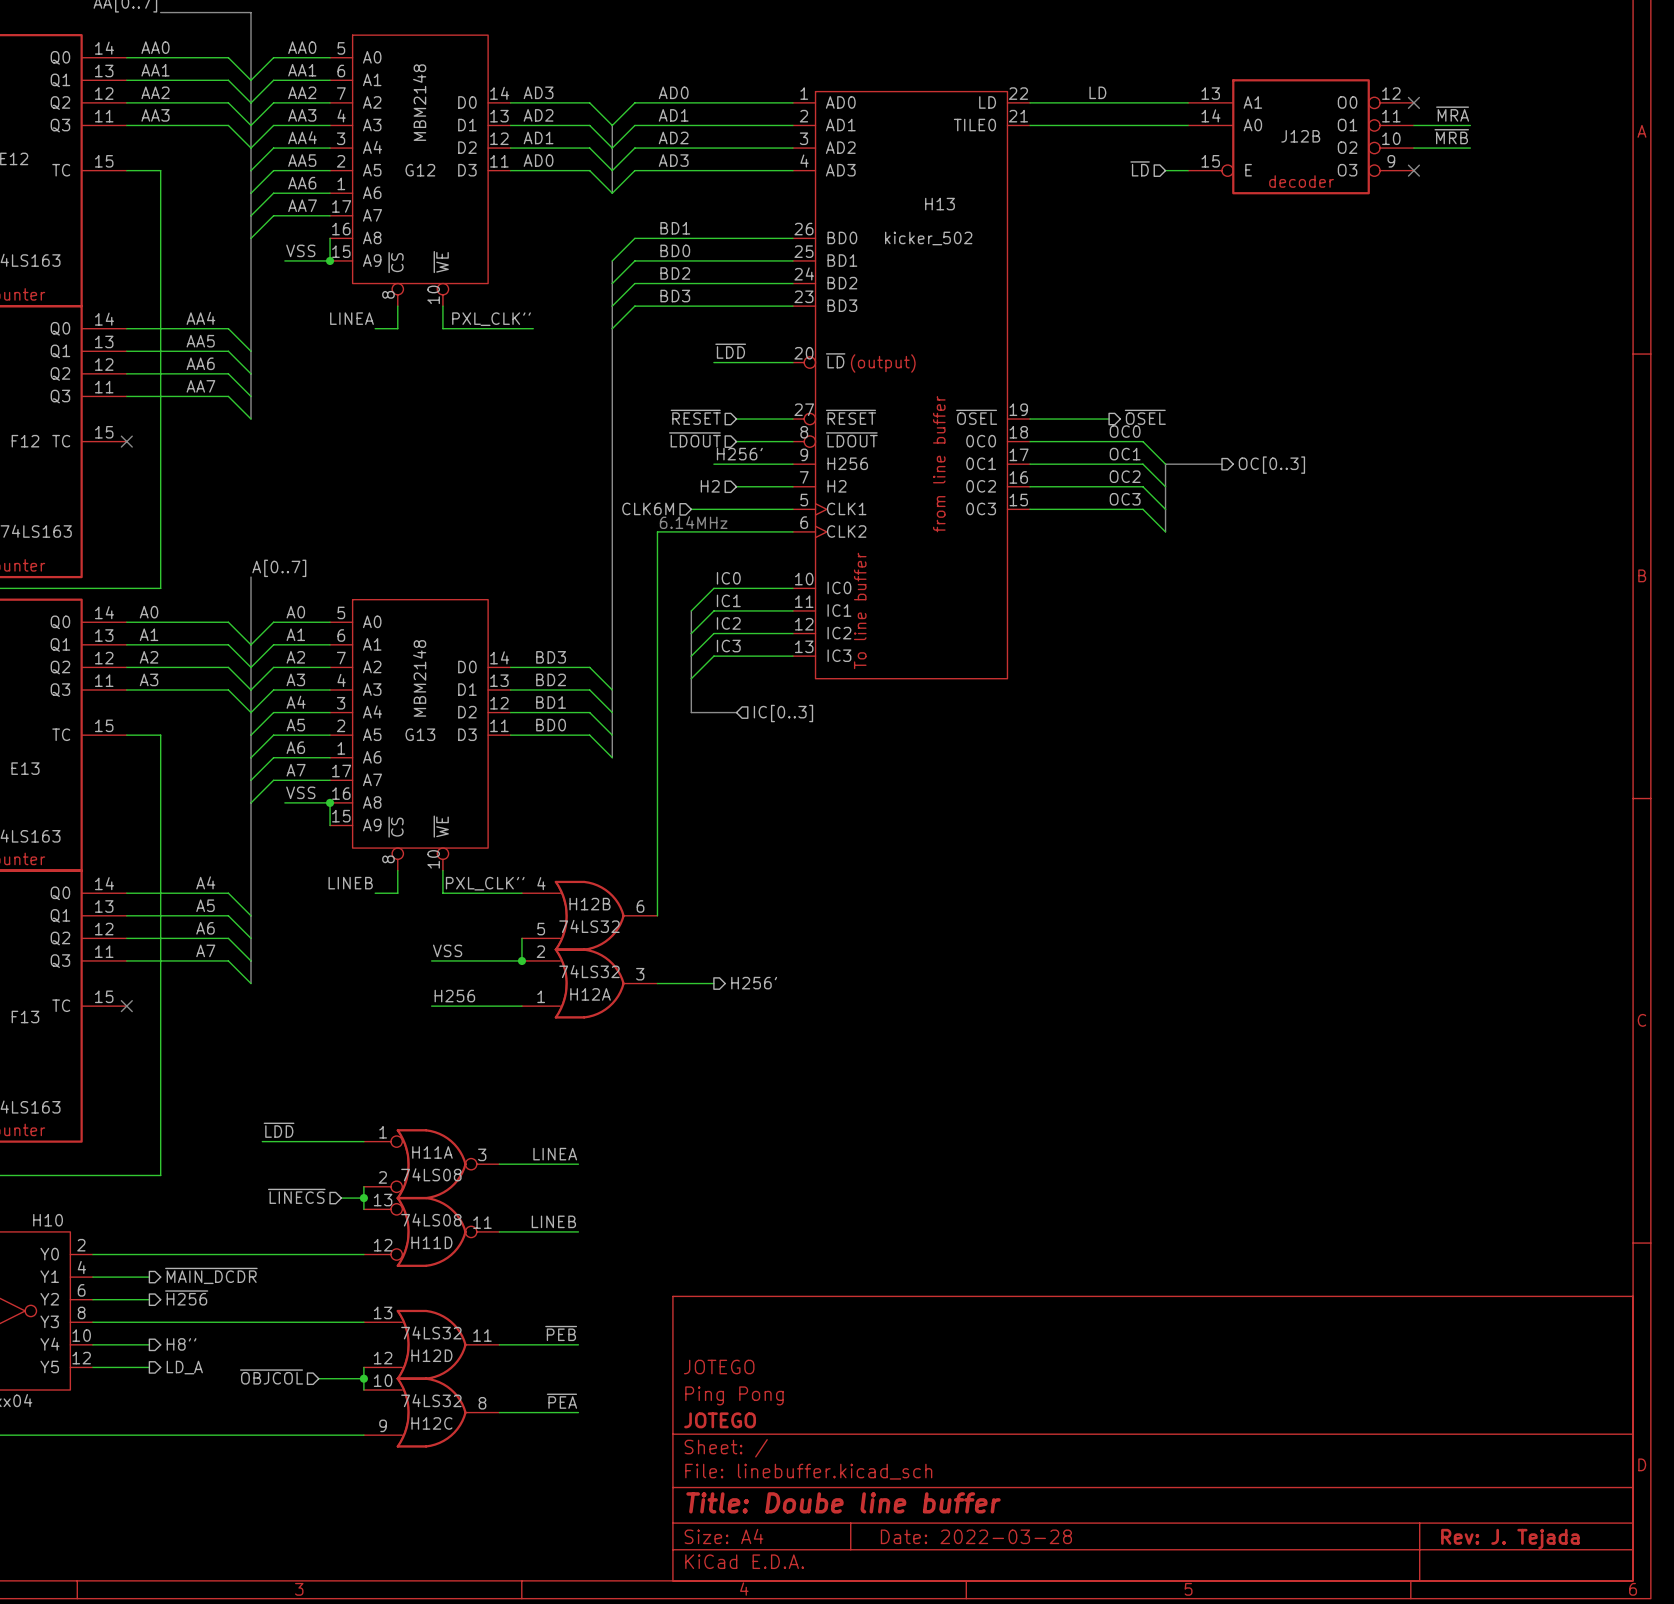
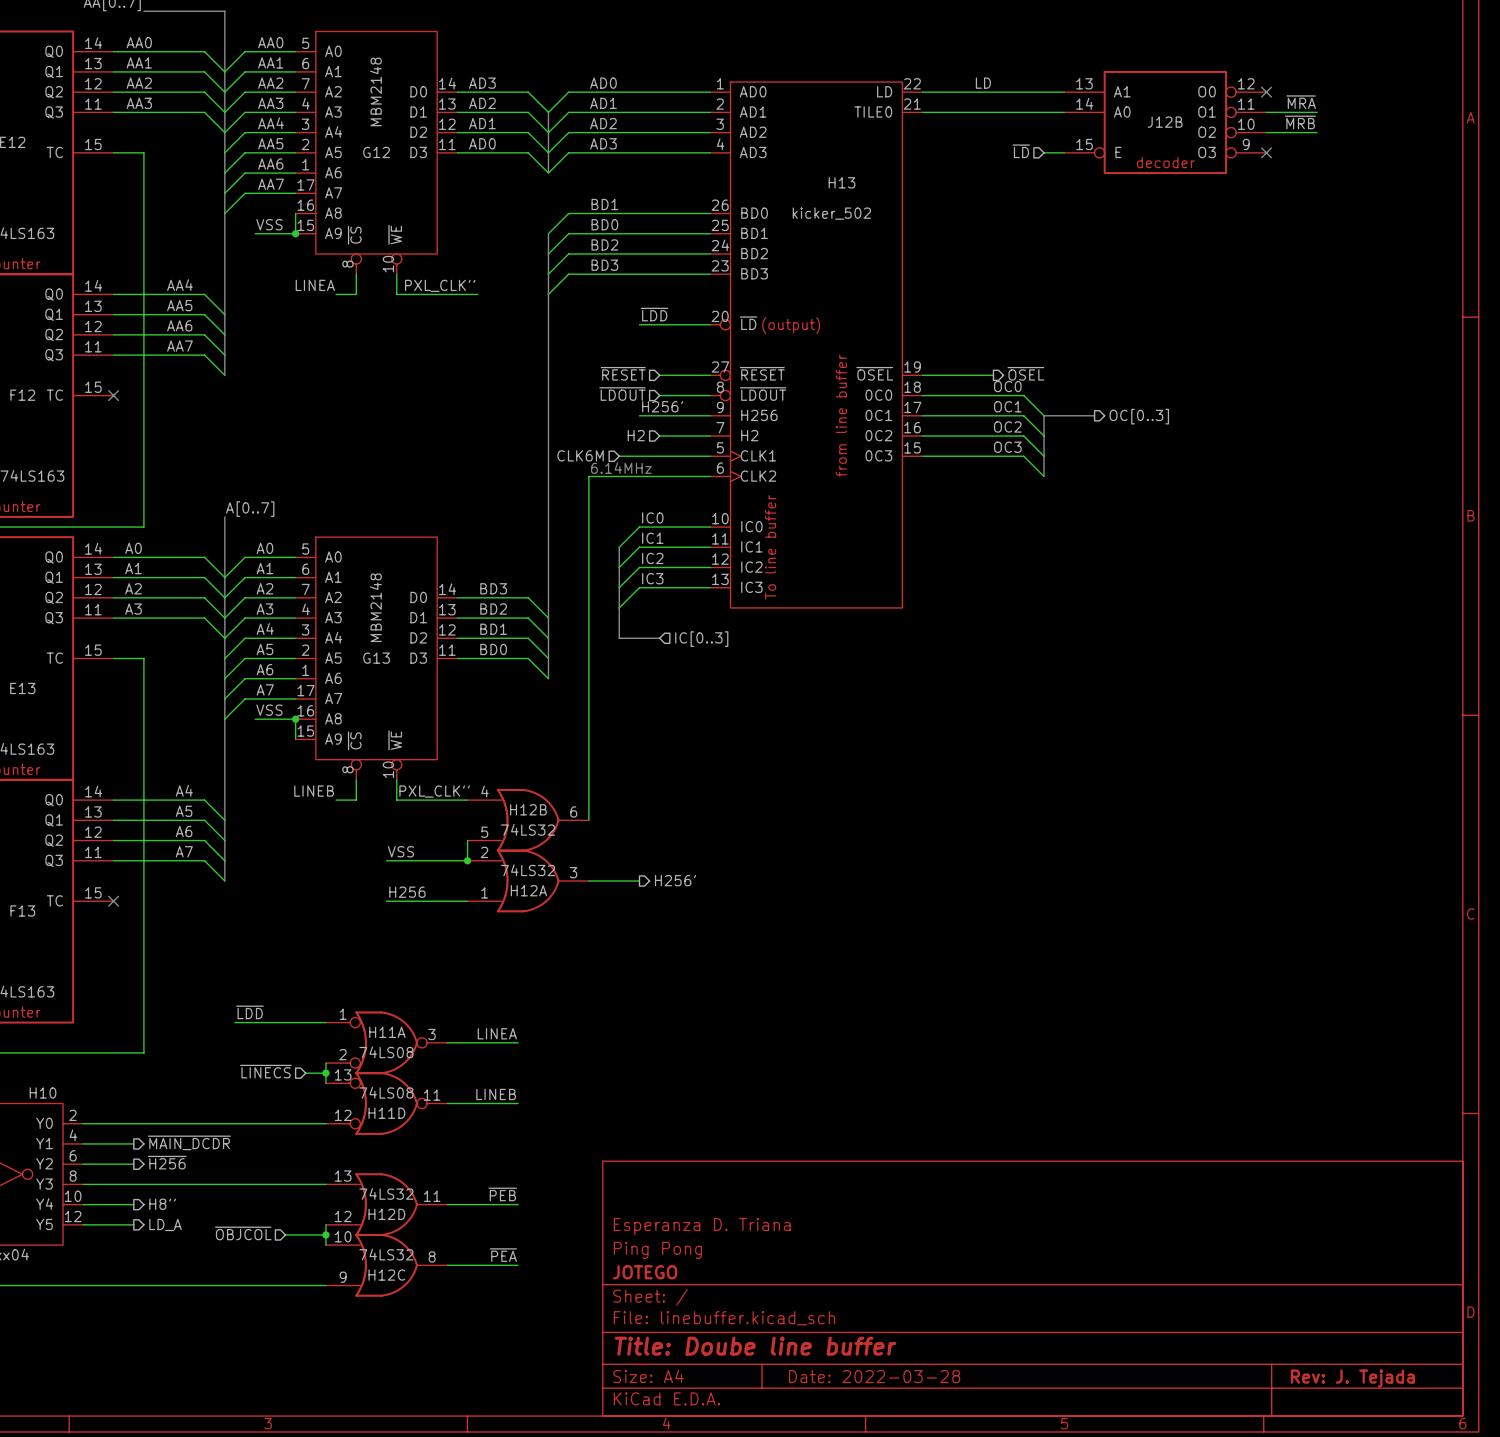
title block: JOTEGO (719, 1367) -> Esperanza D. Triana (702, 1226)

